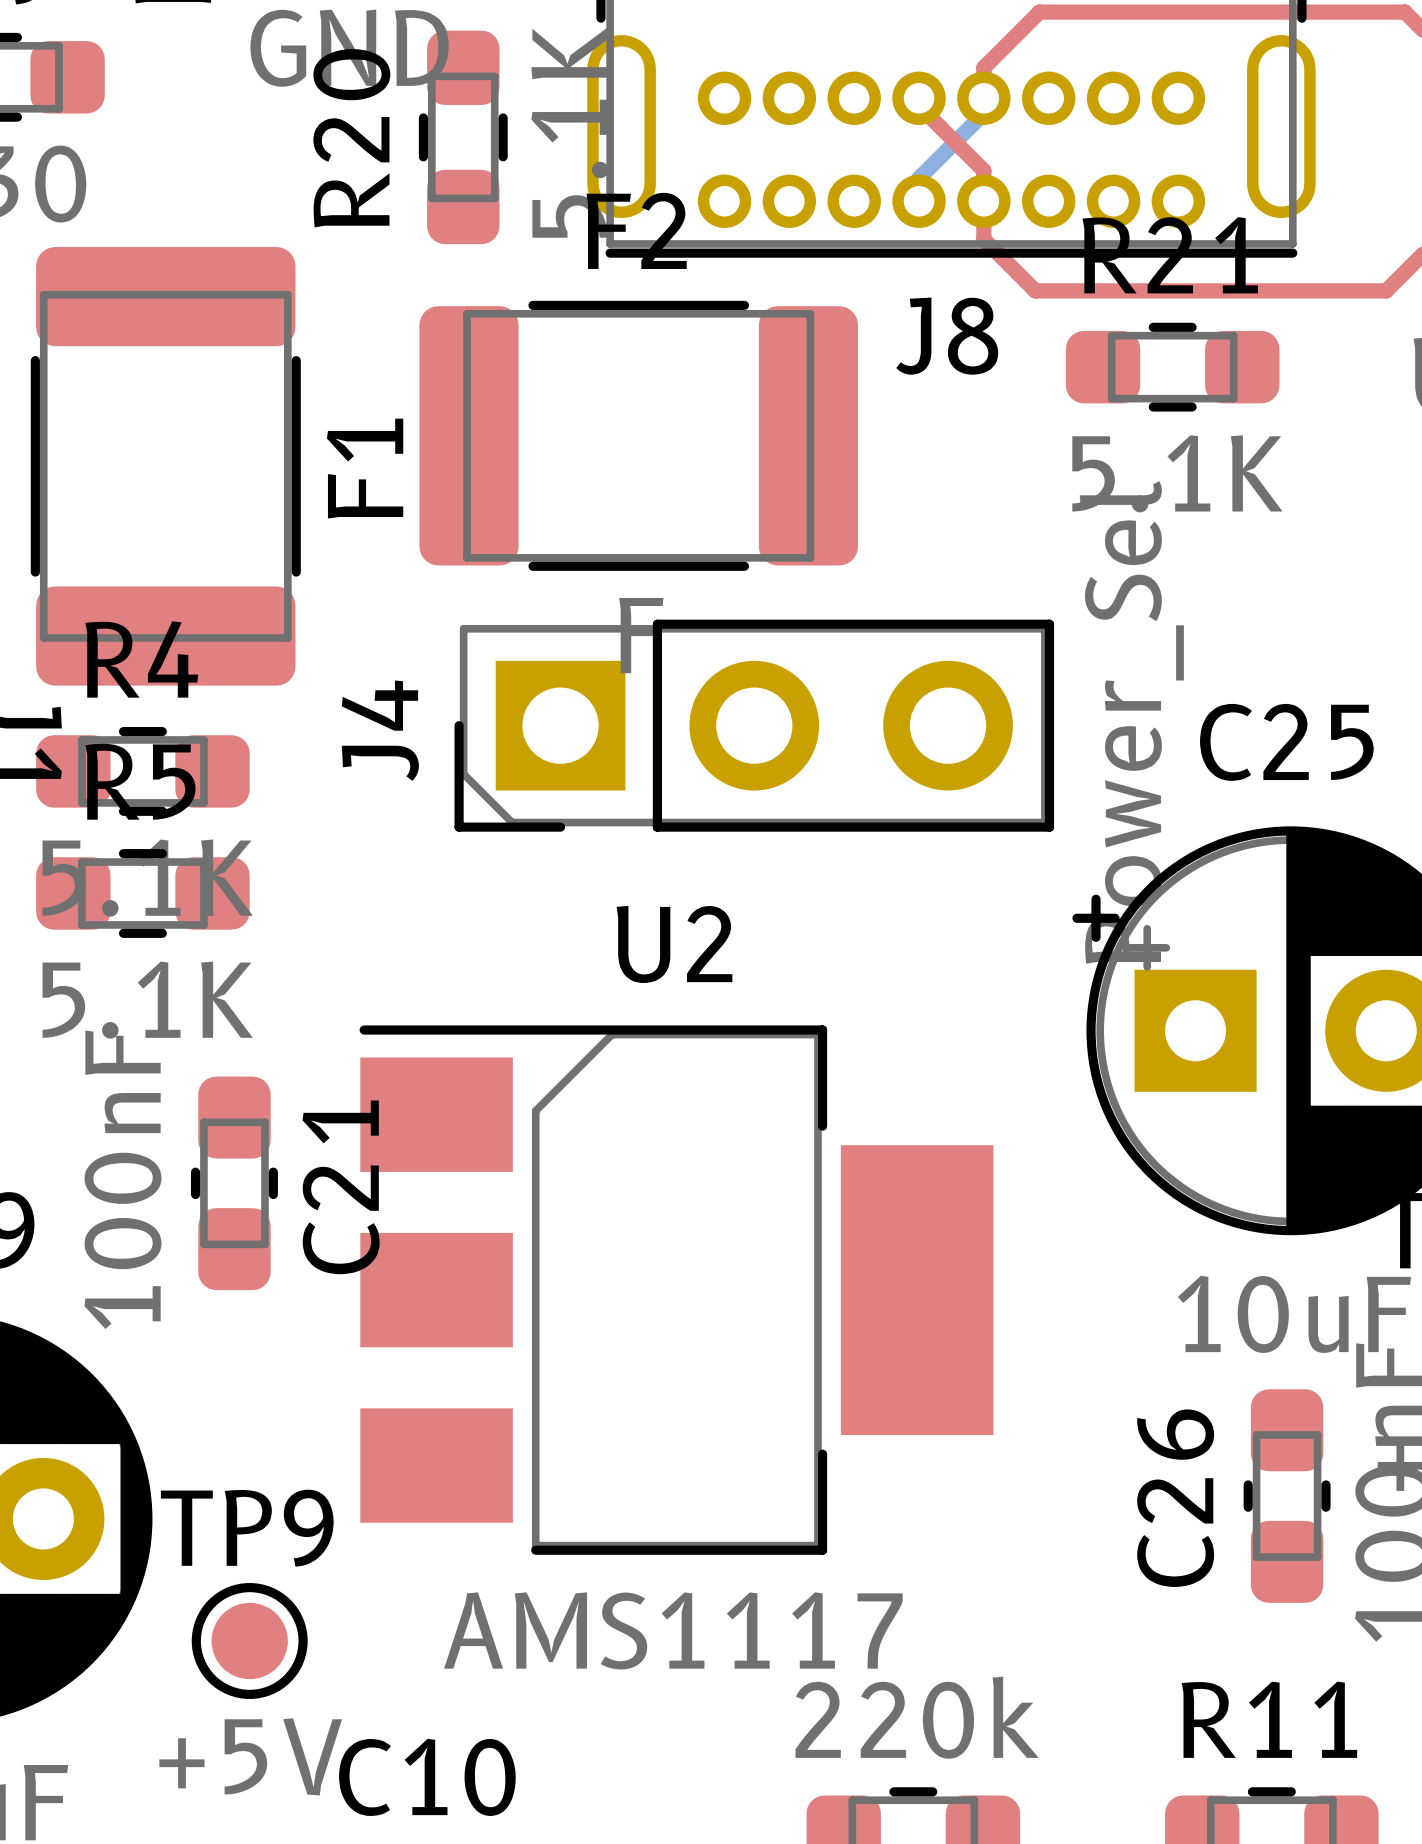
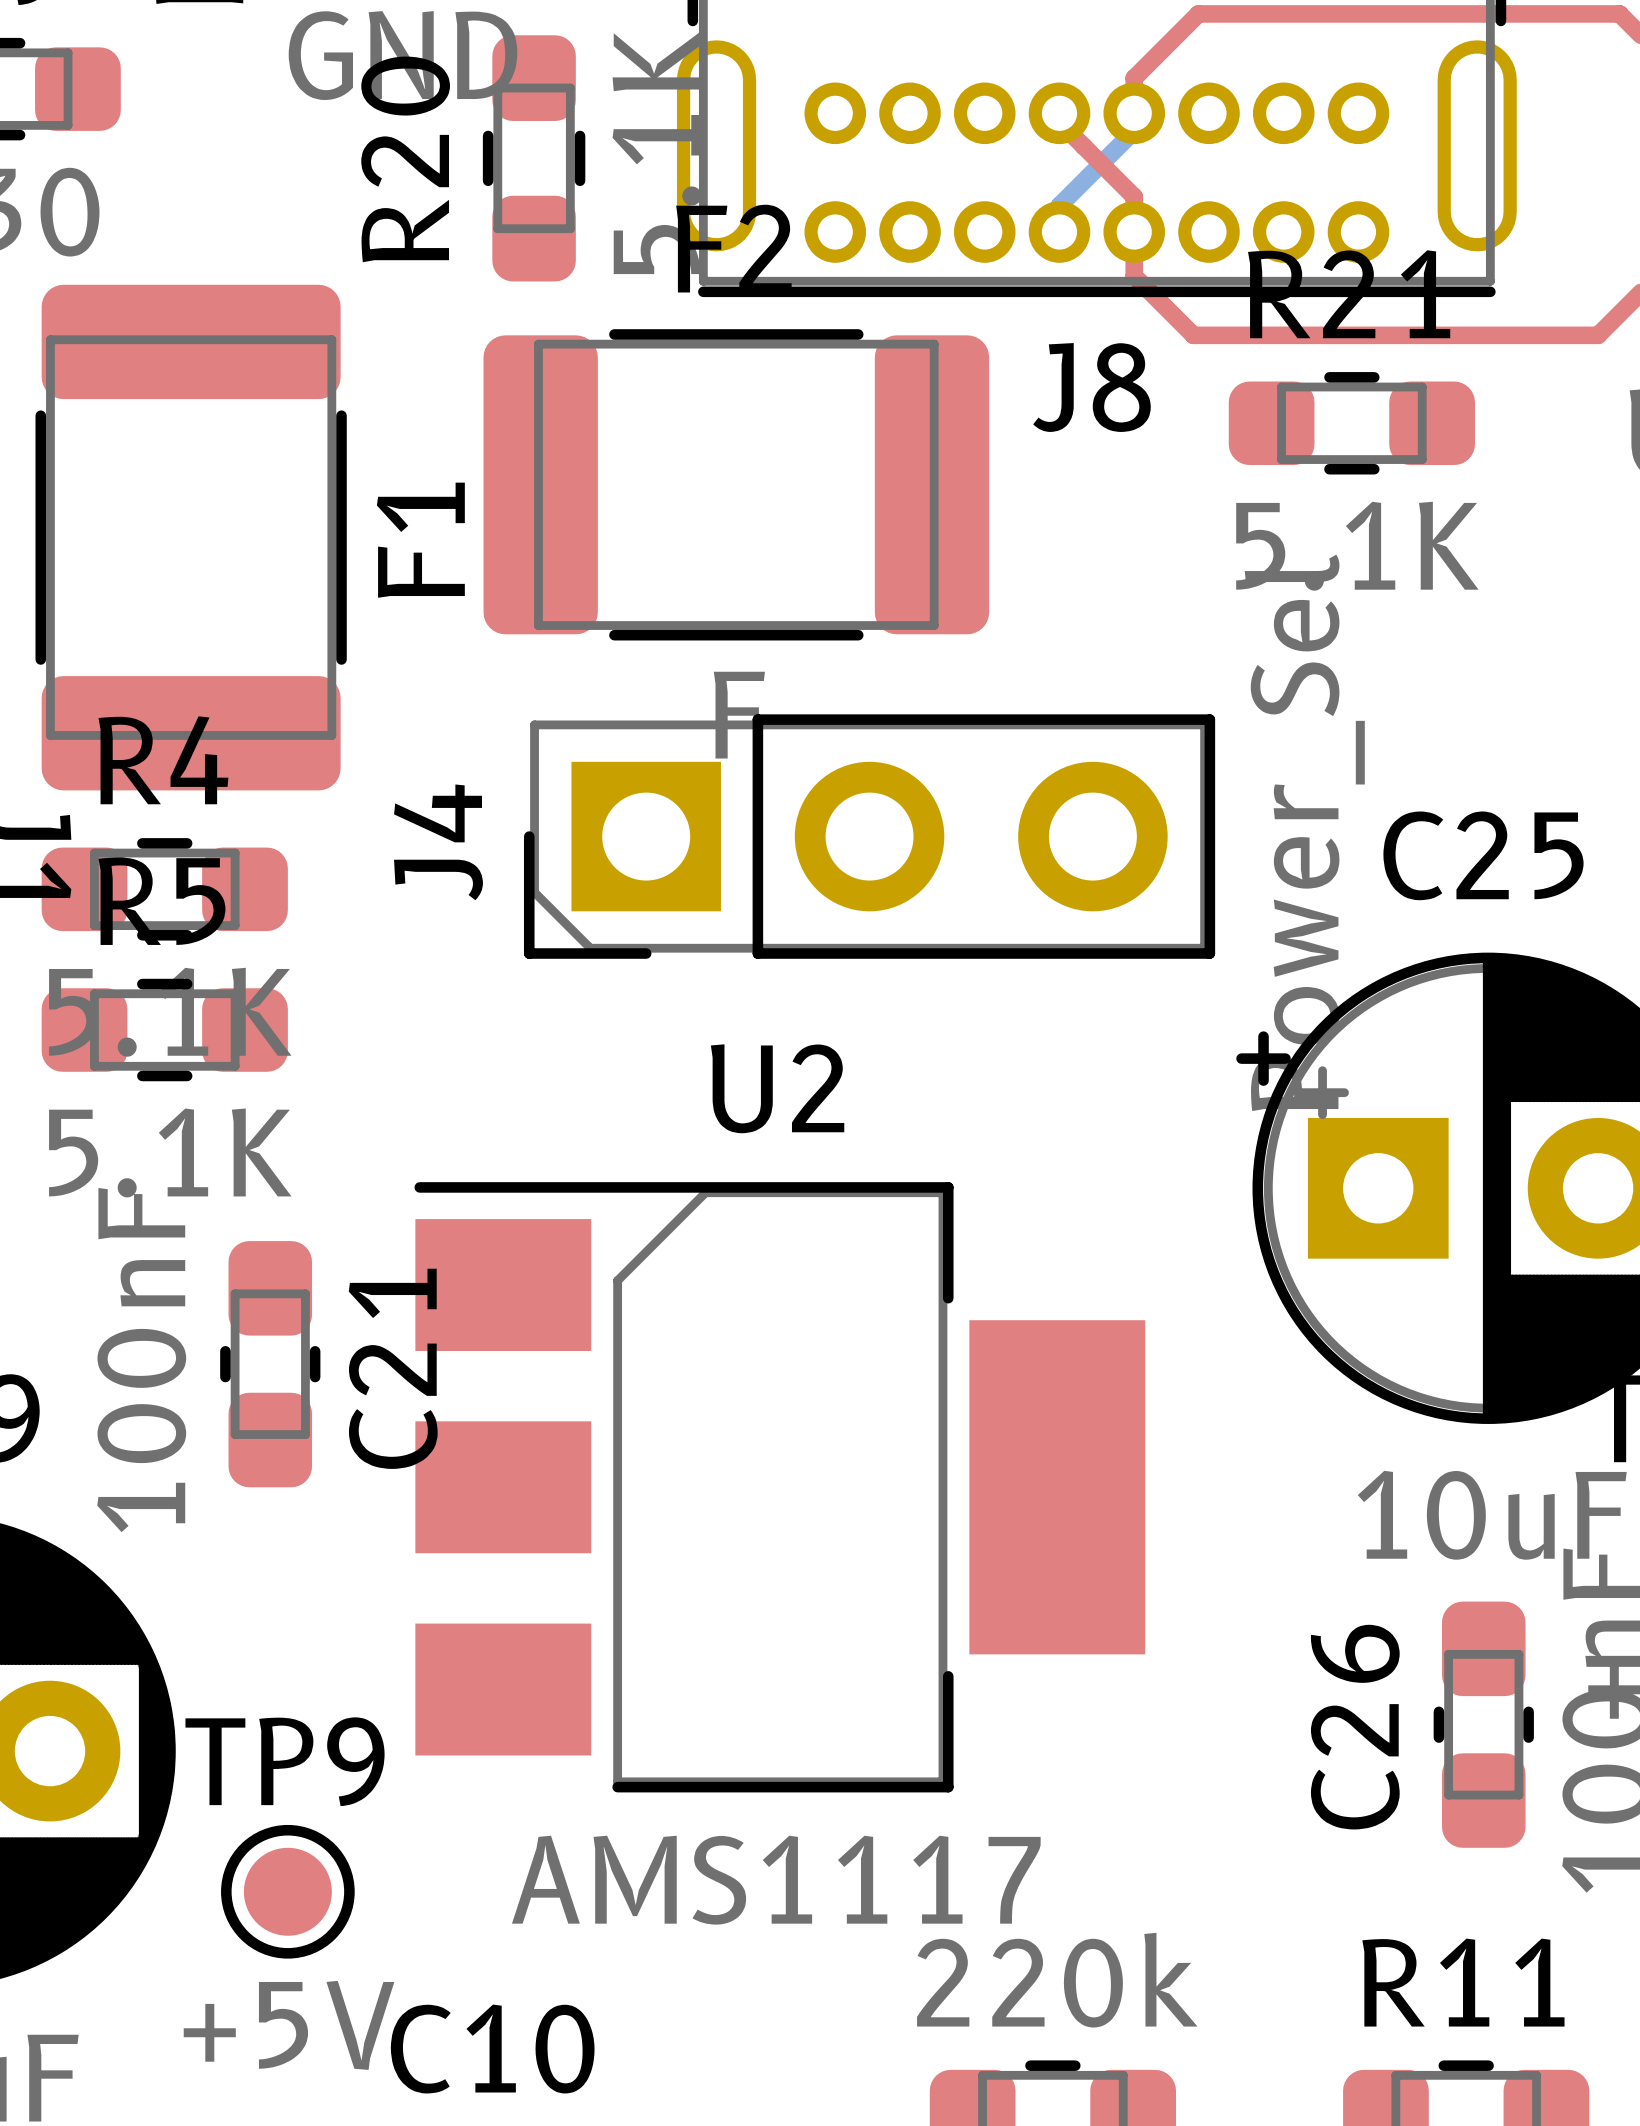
F2 position: (638, 435) -> (736, 484)

